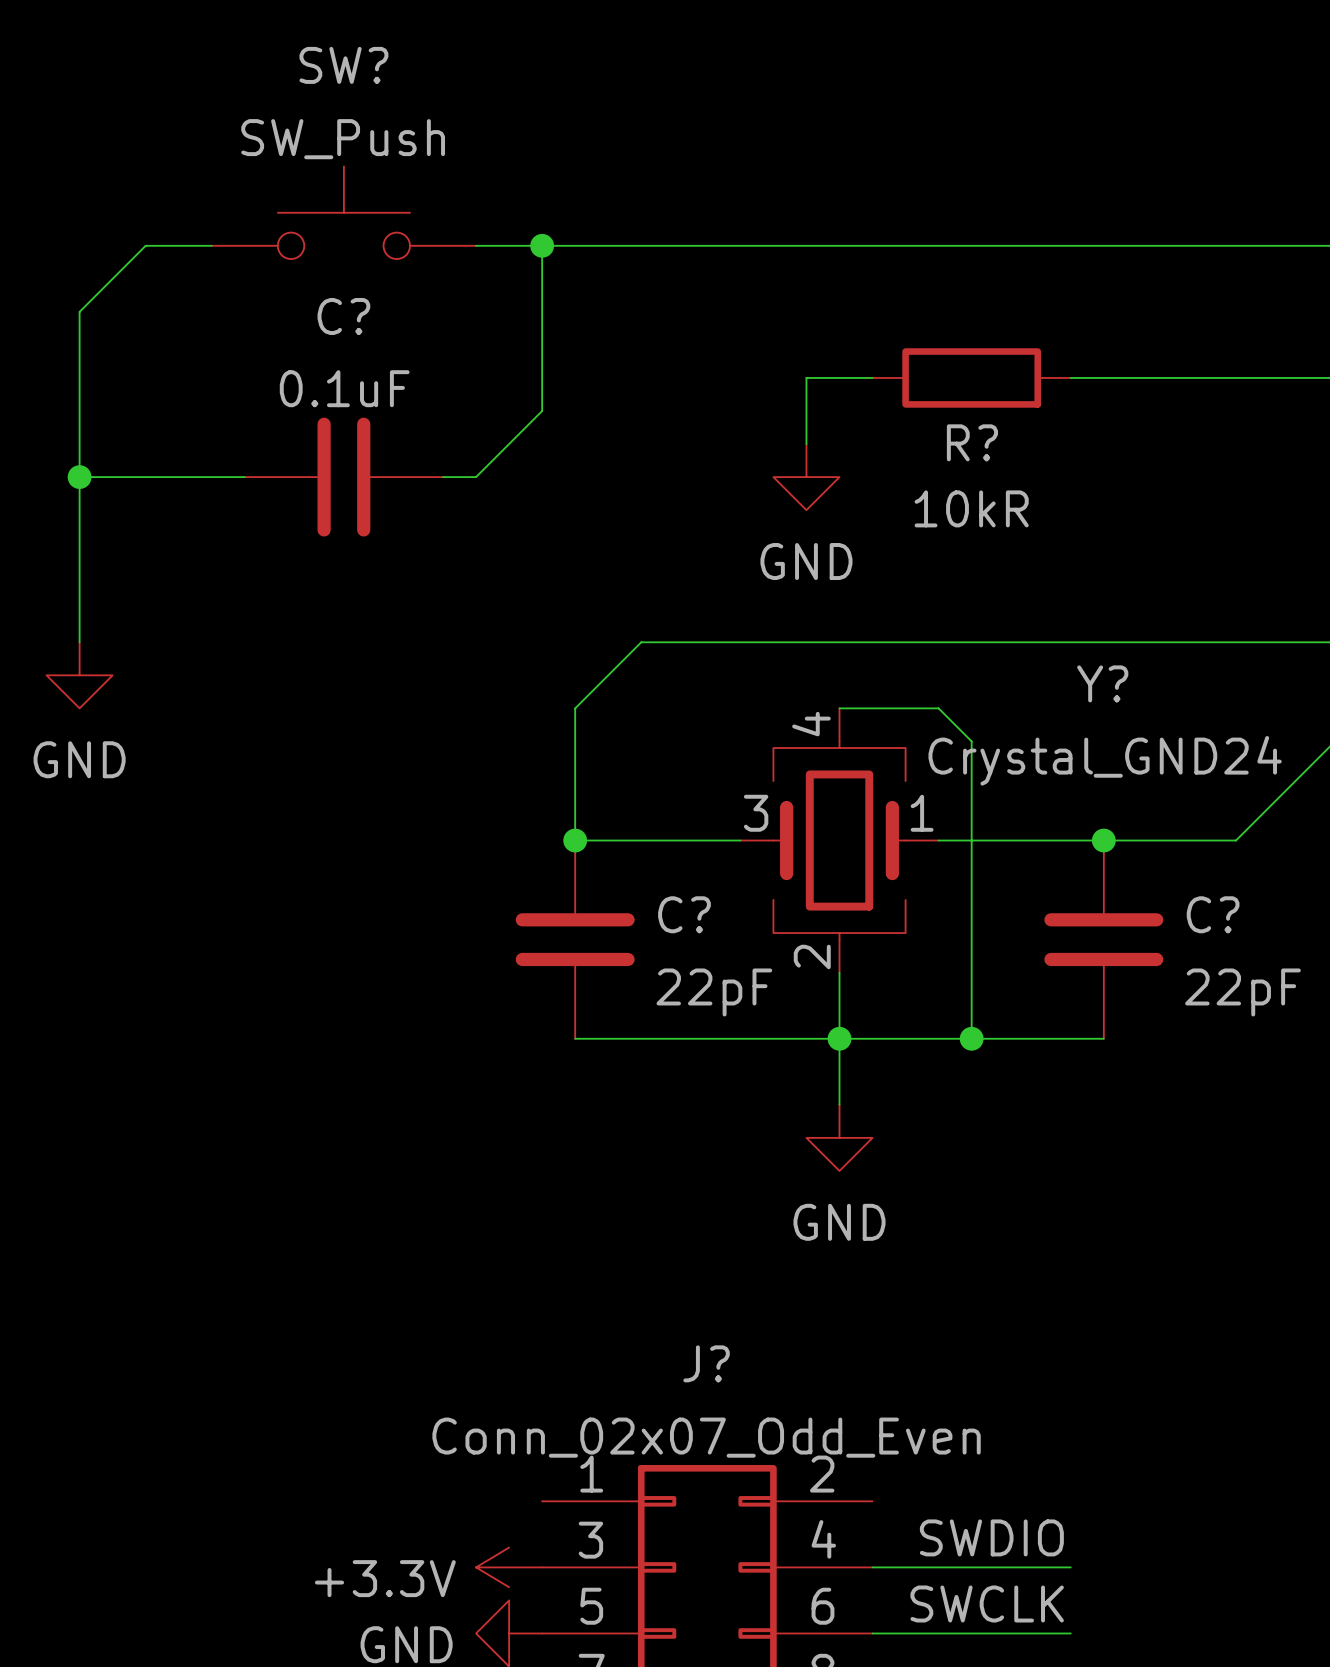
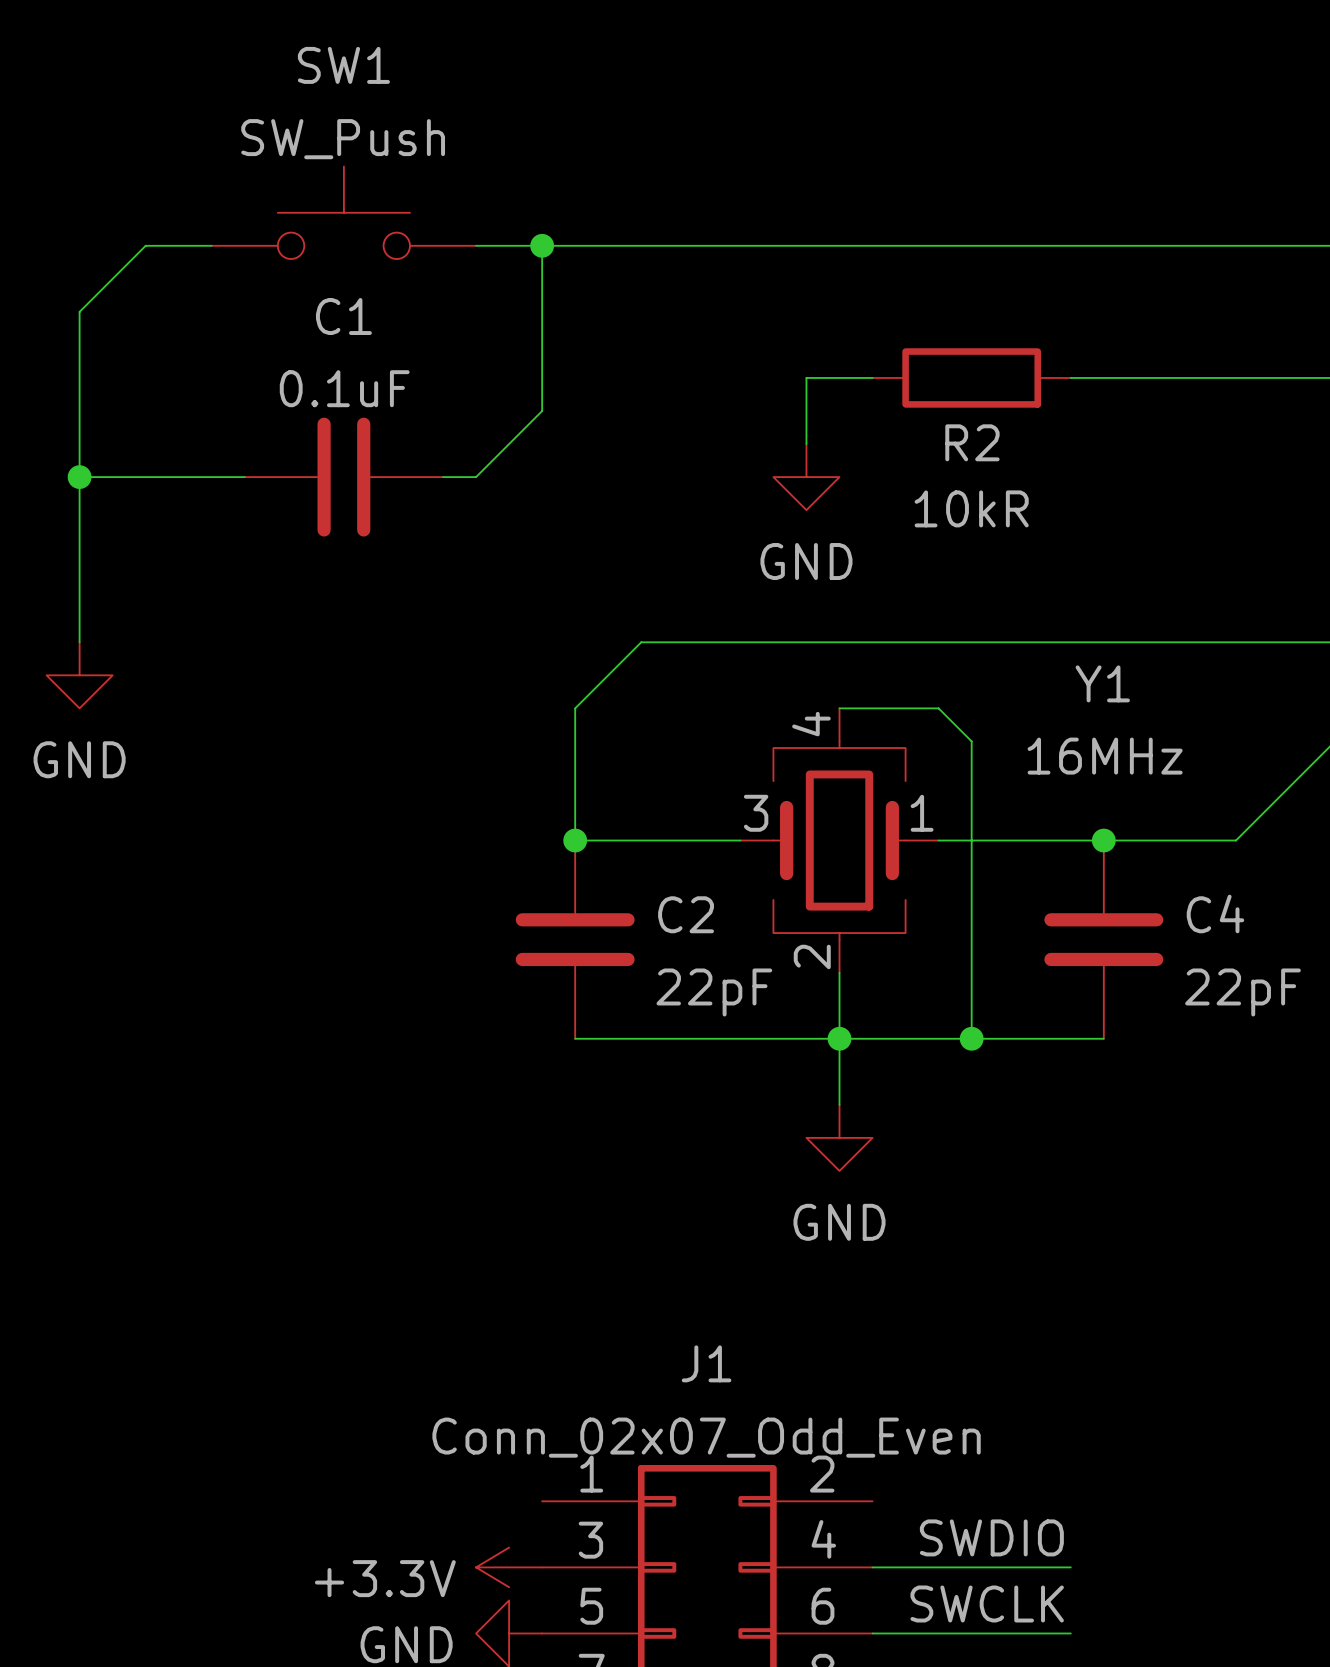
SW? name: SW? (343, 65) -> SW1 (343, 65)
C? name: C? (343, 316) -> C1 (343, 316)
R? name: R? (972, 442) -> R2 (972, 442)
Y? name: Y? (1102, 683) -> Y1 (1102, 683)
Y? value: Crystal_GND24 (1105, 760) -> 16MHz (1105, 756)
C? name: C? (684, 914) -> C2 (686, 914)
C? name: C? (1213, 914) -> C4 (1215, 913)
J? name: J? (706, 1363) -> J1 (706, 1363)

